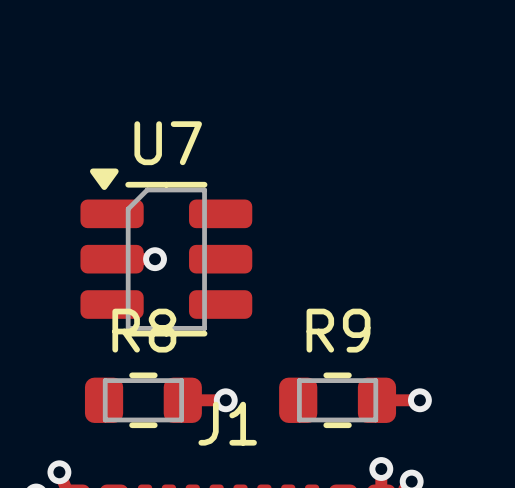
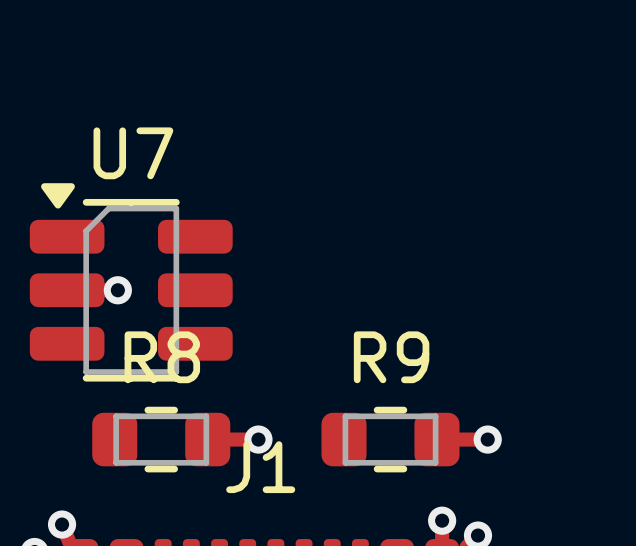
U7 position: (166, 252) -> (131, 282)
via position: (155, 259) -> (117, 290)

